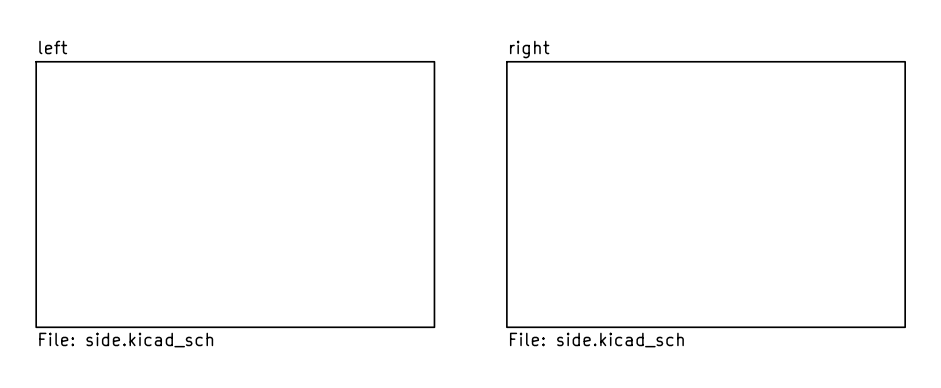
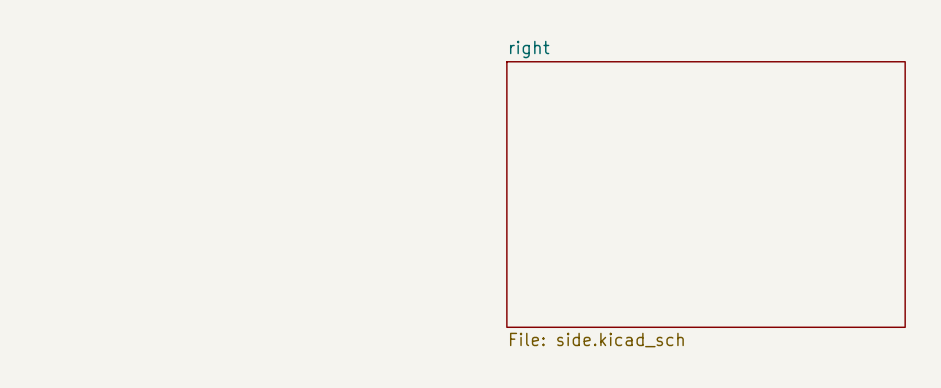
sheet left: File: side.kicad_sch (235, 194) -> none

